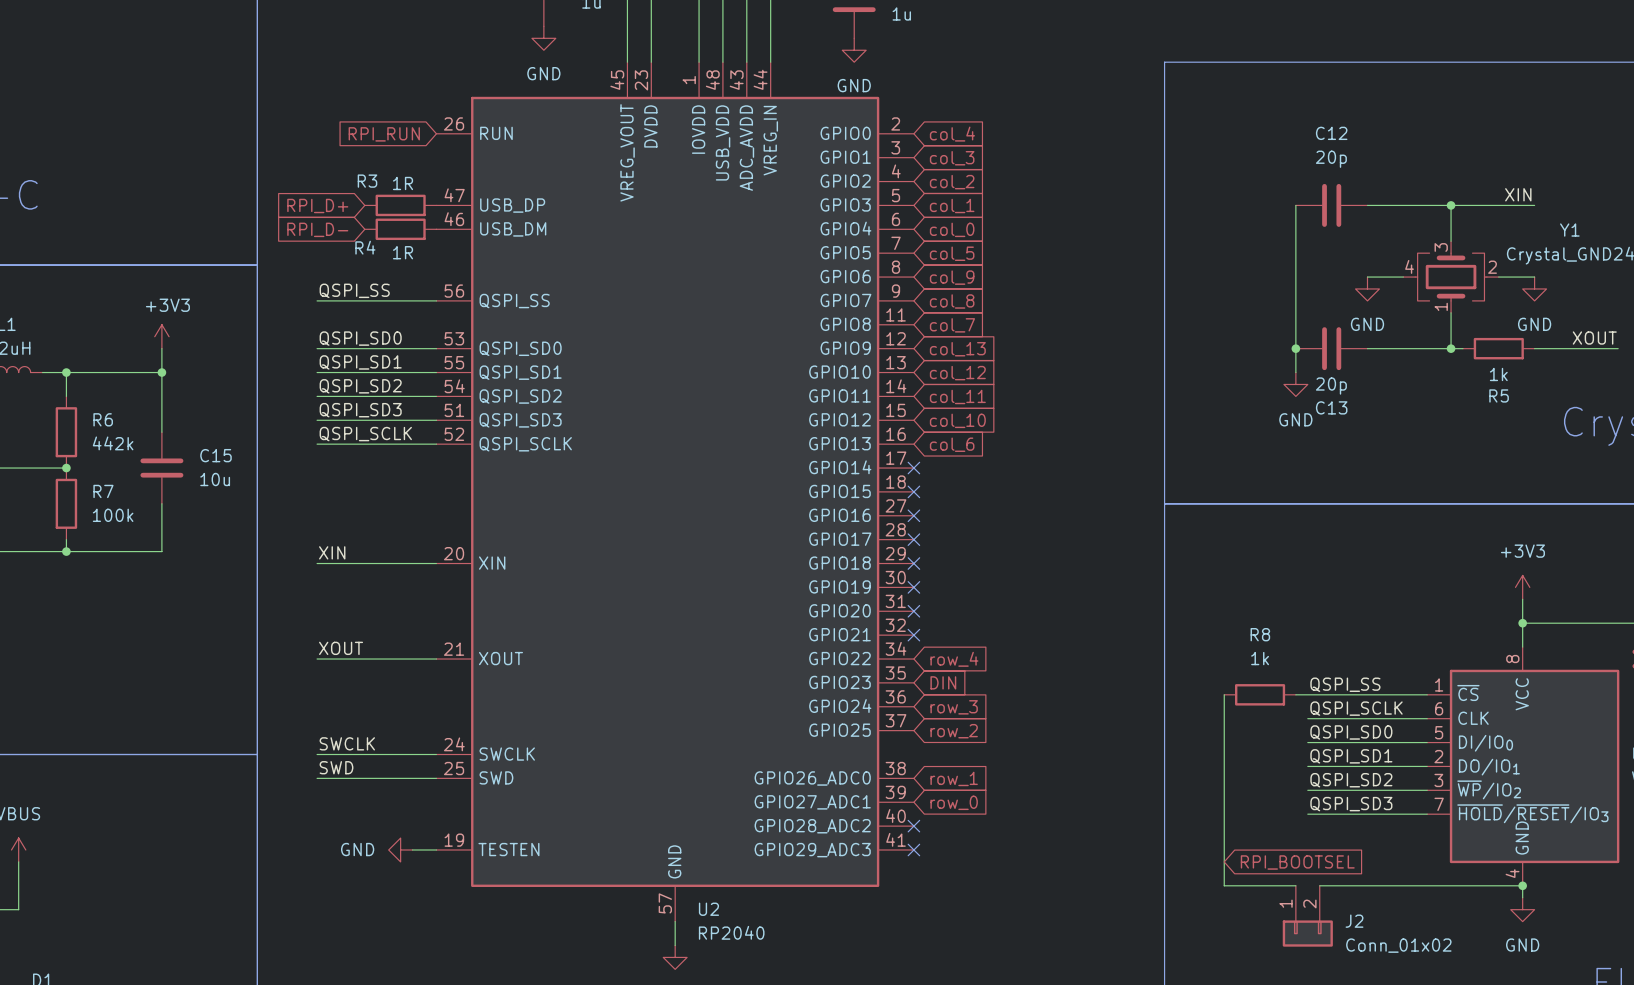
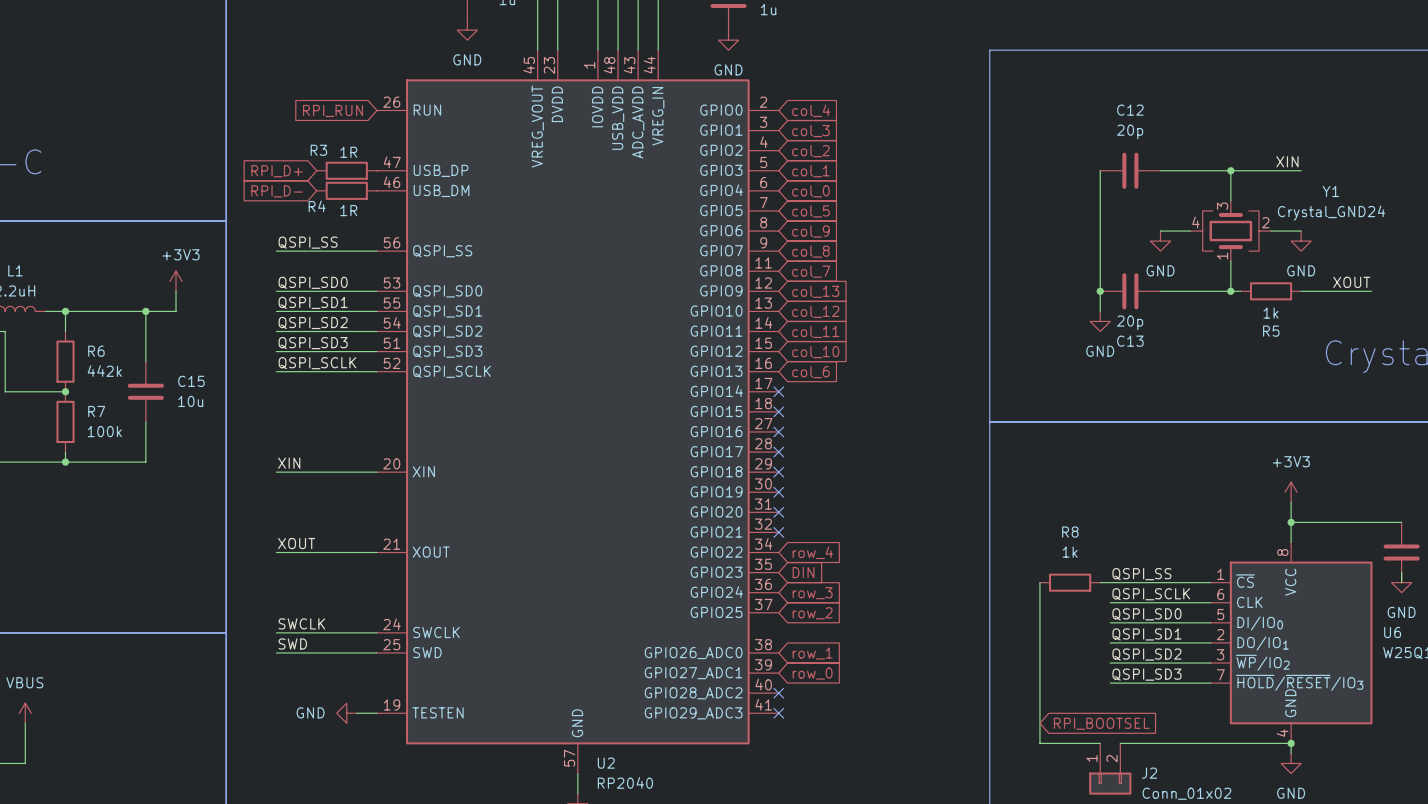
power symbol position: +3V3 (161, 336) -> +3V3 (176, 281)
wire: (161, 348) (161, 372) -> (176, 291) (176, 311) (145, 311)

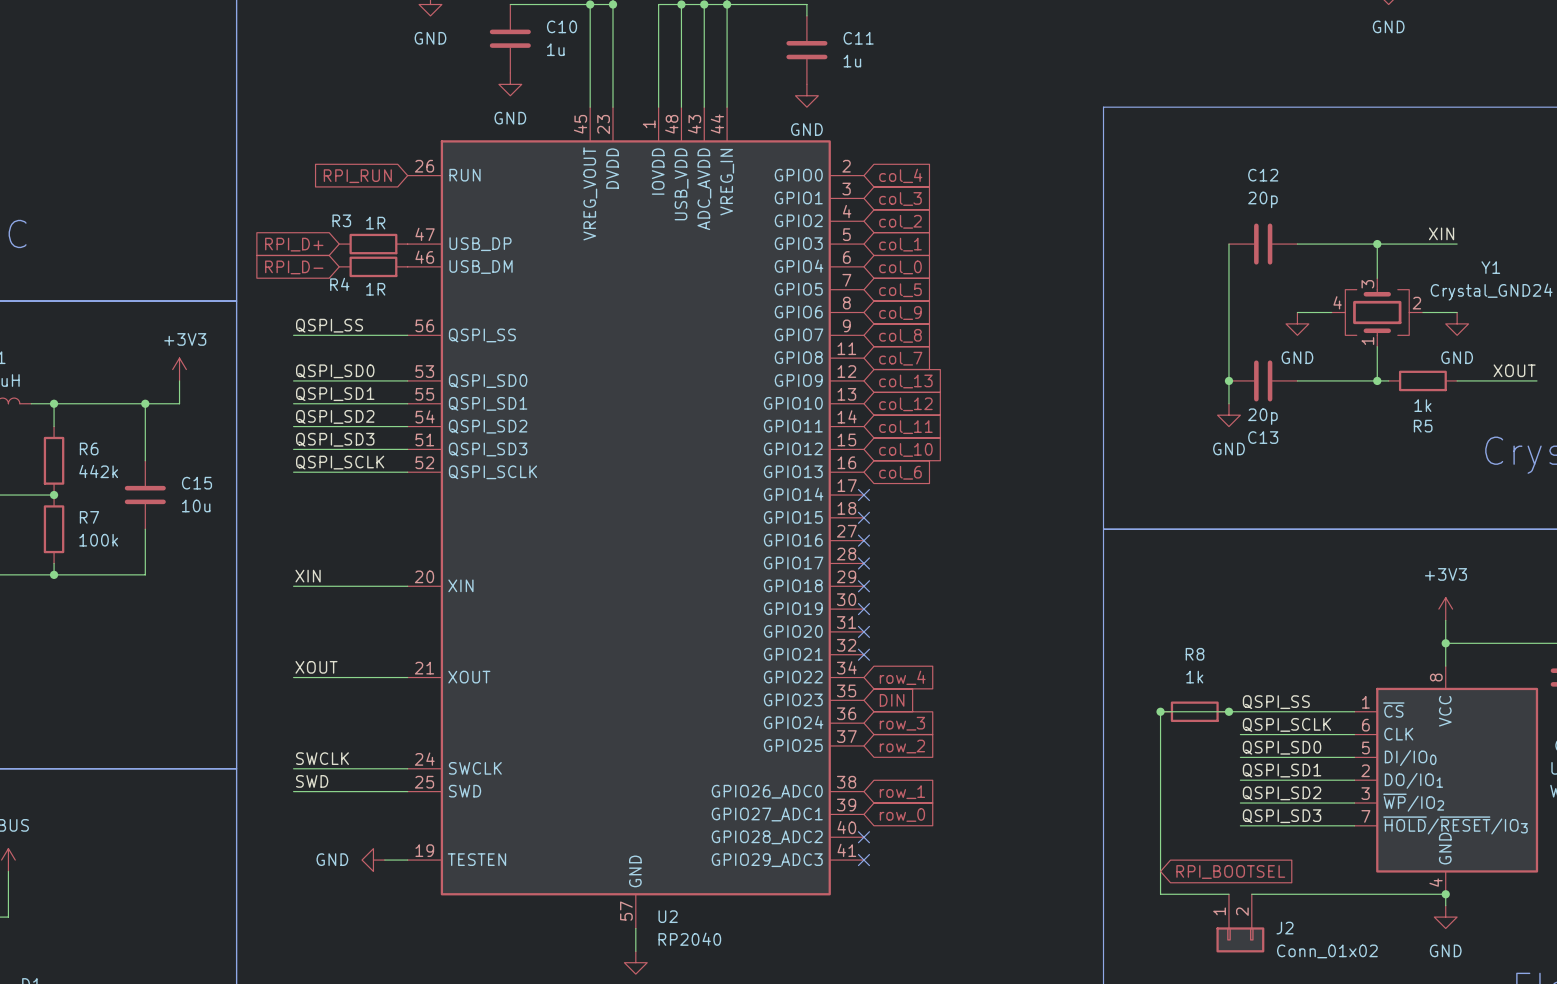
wire: none -> (1160, 711) (1228, 711)
junction: none -> (1160, 711)
junction: none -> (1228, 711)

